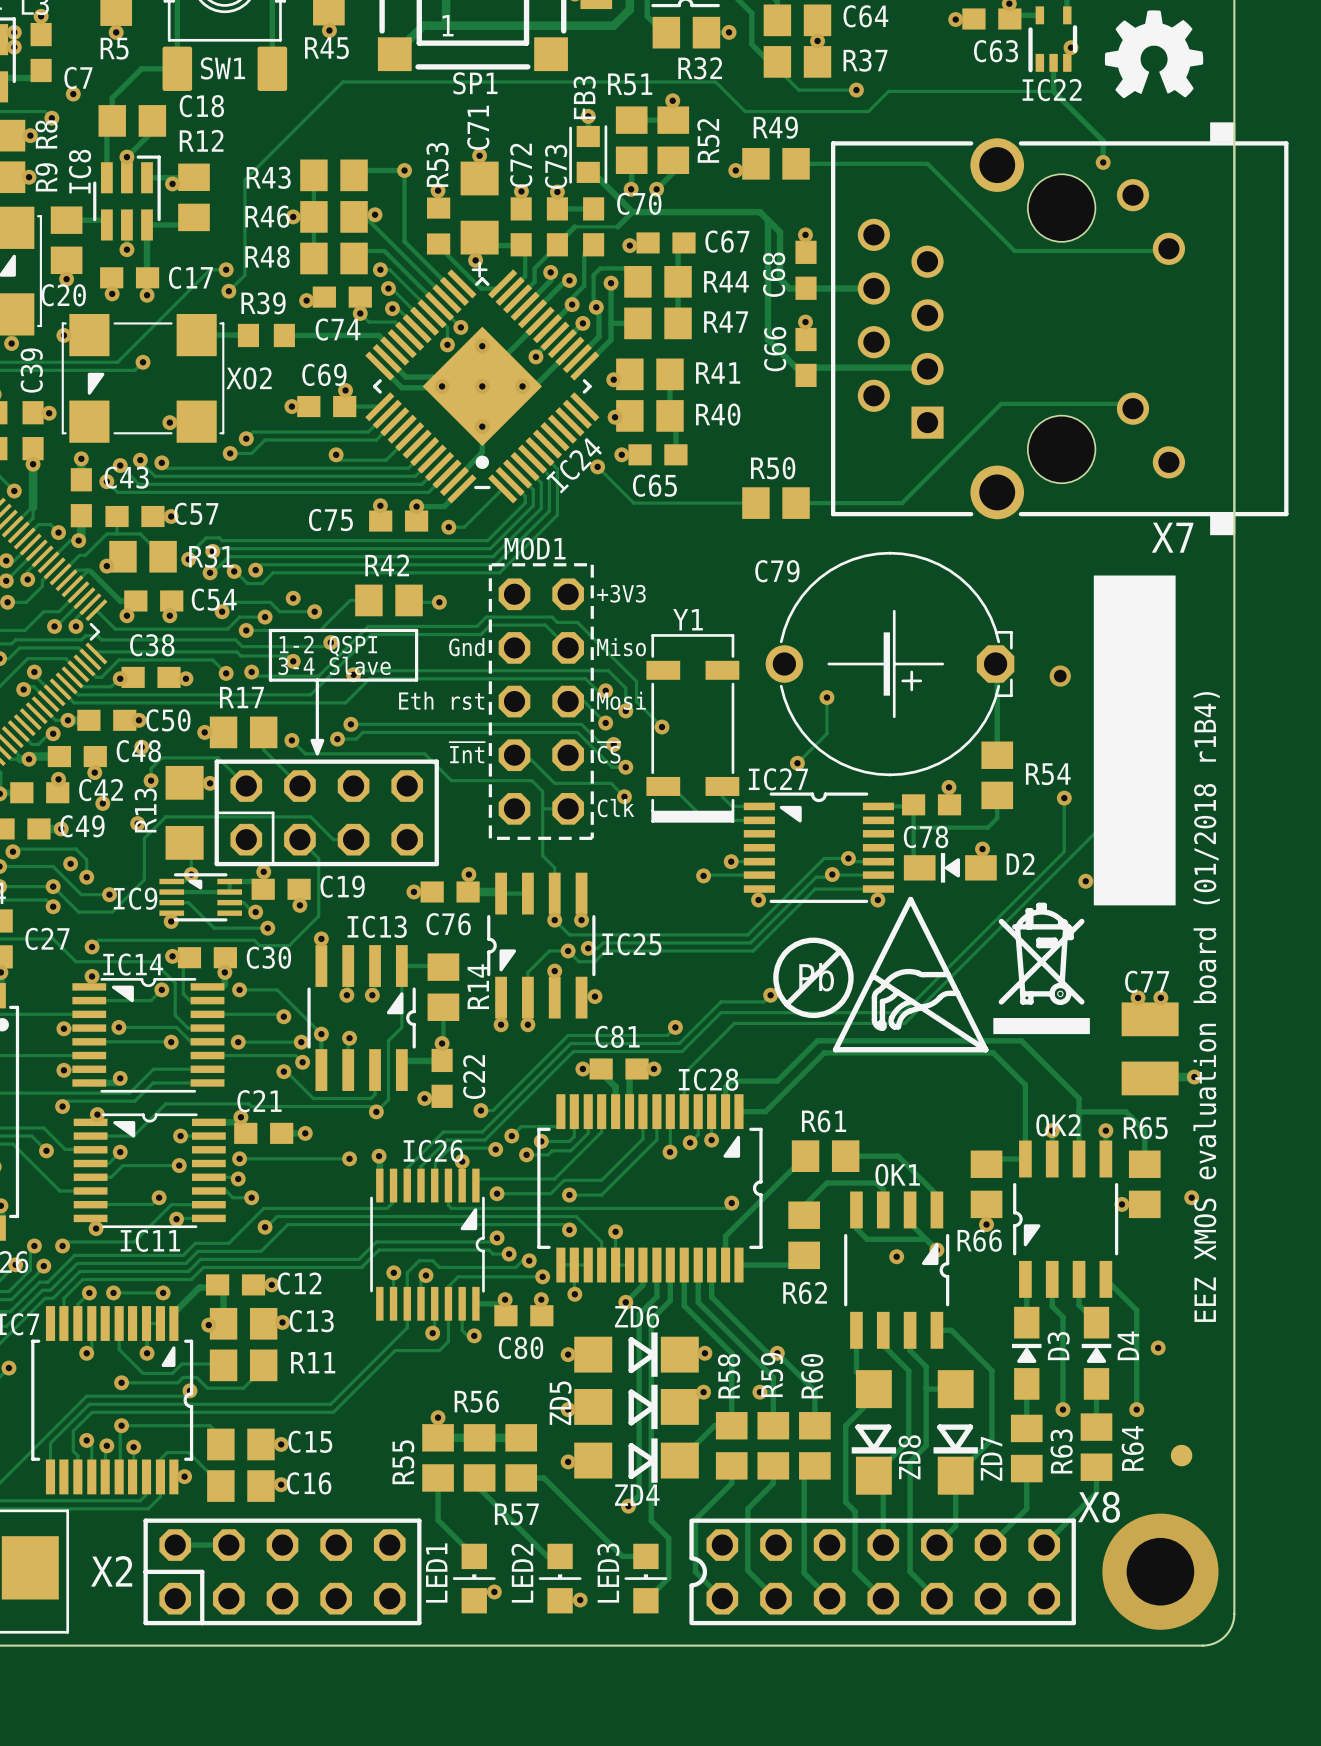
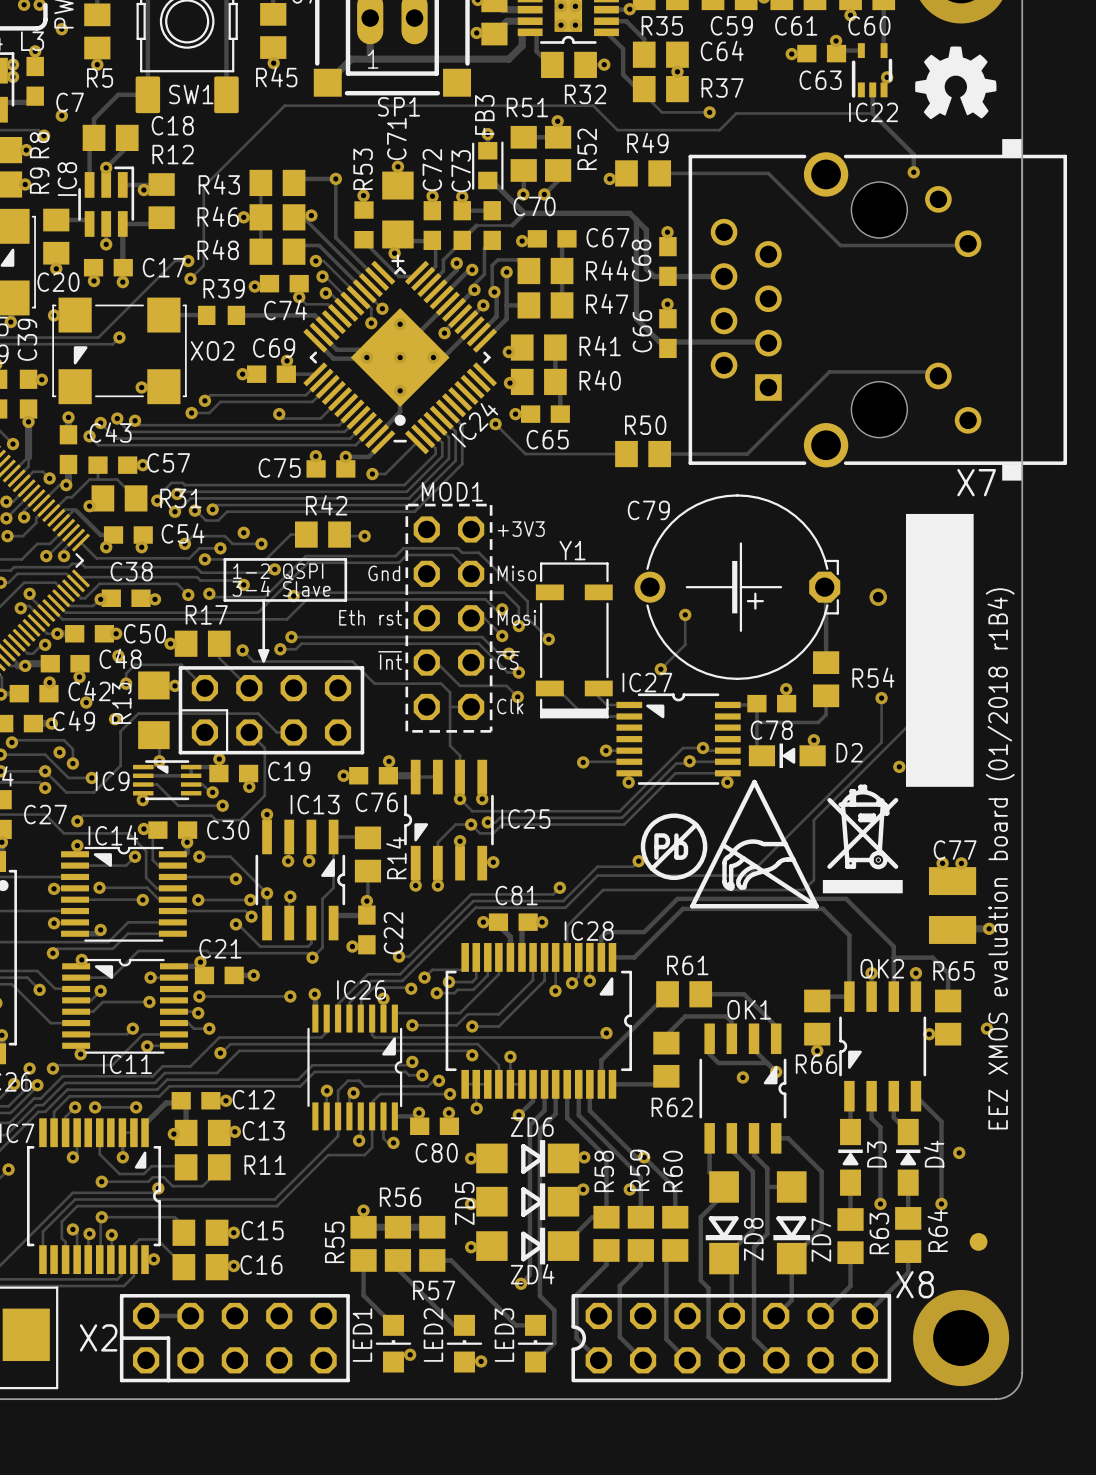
track: (982, 945) (904, 1023) (734, 1023) (727, 1030) -> (813, 820) (813, 880) (803, 889) (603, 889)

